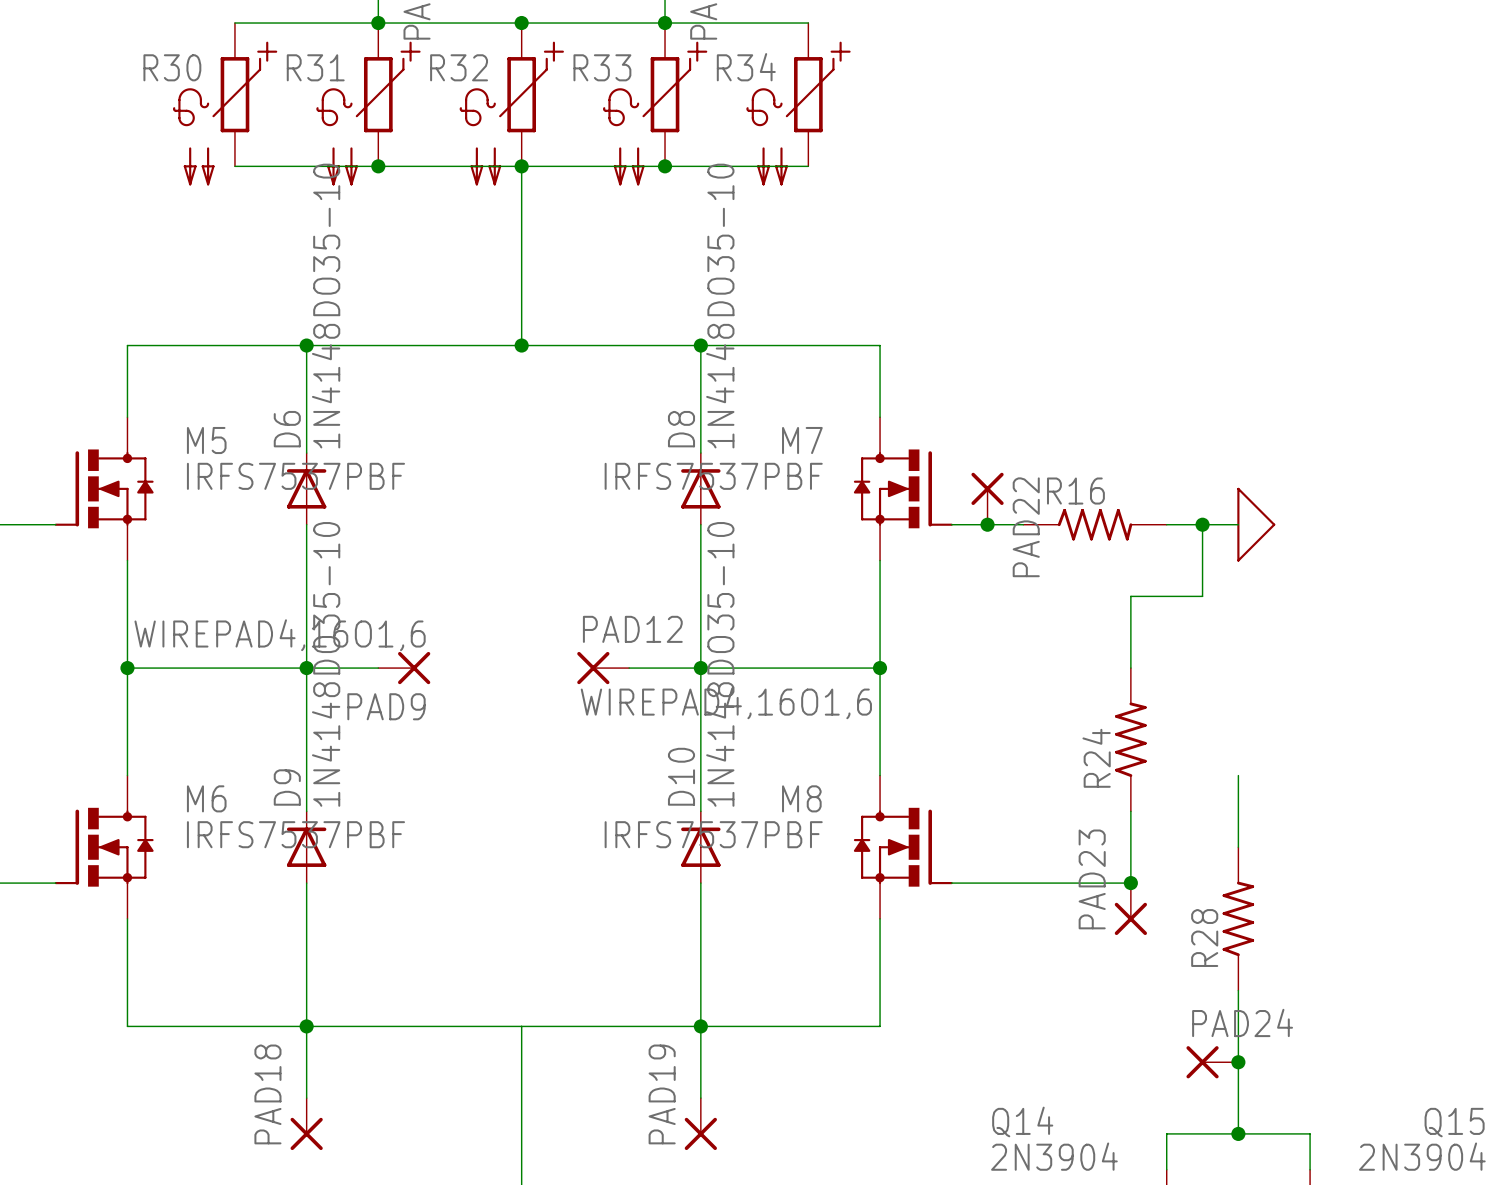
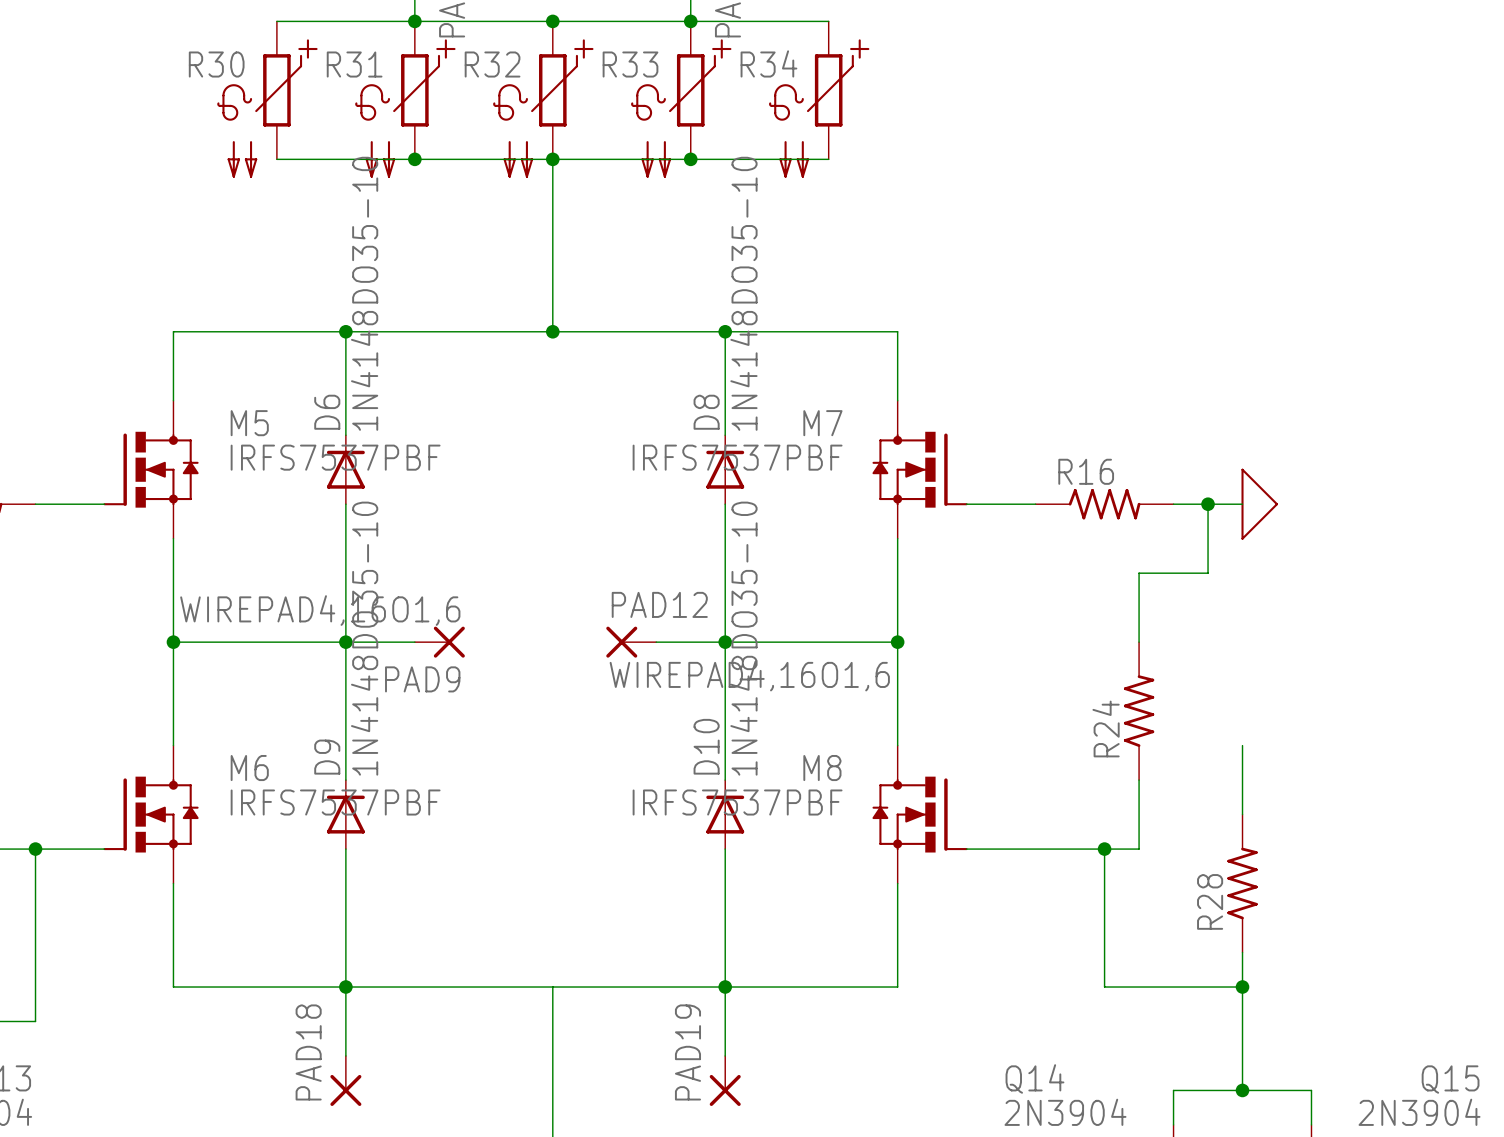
PAD22: (987, 498) -> none
junction: (987, 524) -> none
wire: none -> (1104, 849) (1104, 987) (1242, 987)
junction position: (1130, 883) -> (1104, 849)
PAD23: (1130, 909) -> none
PAD24: (1212, 1062) -> none
junction position: (1238, 1062) -> (1242, 987)

